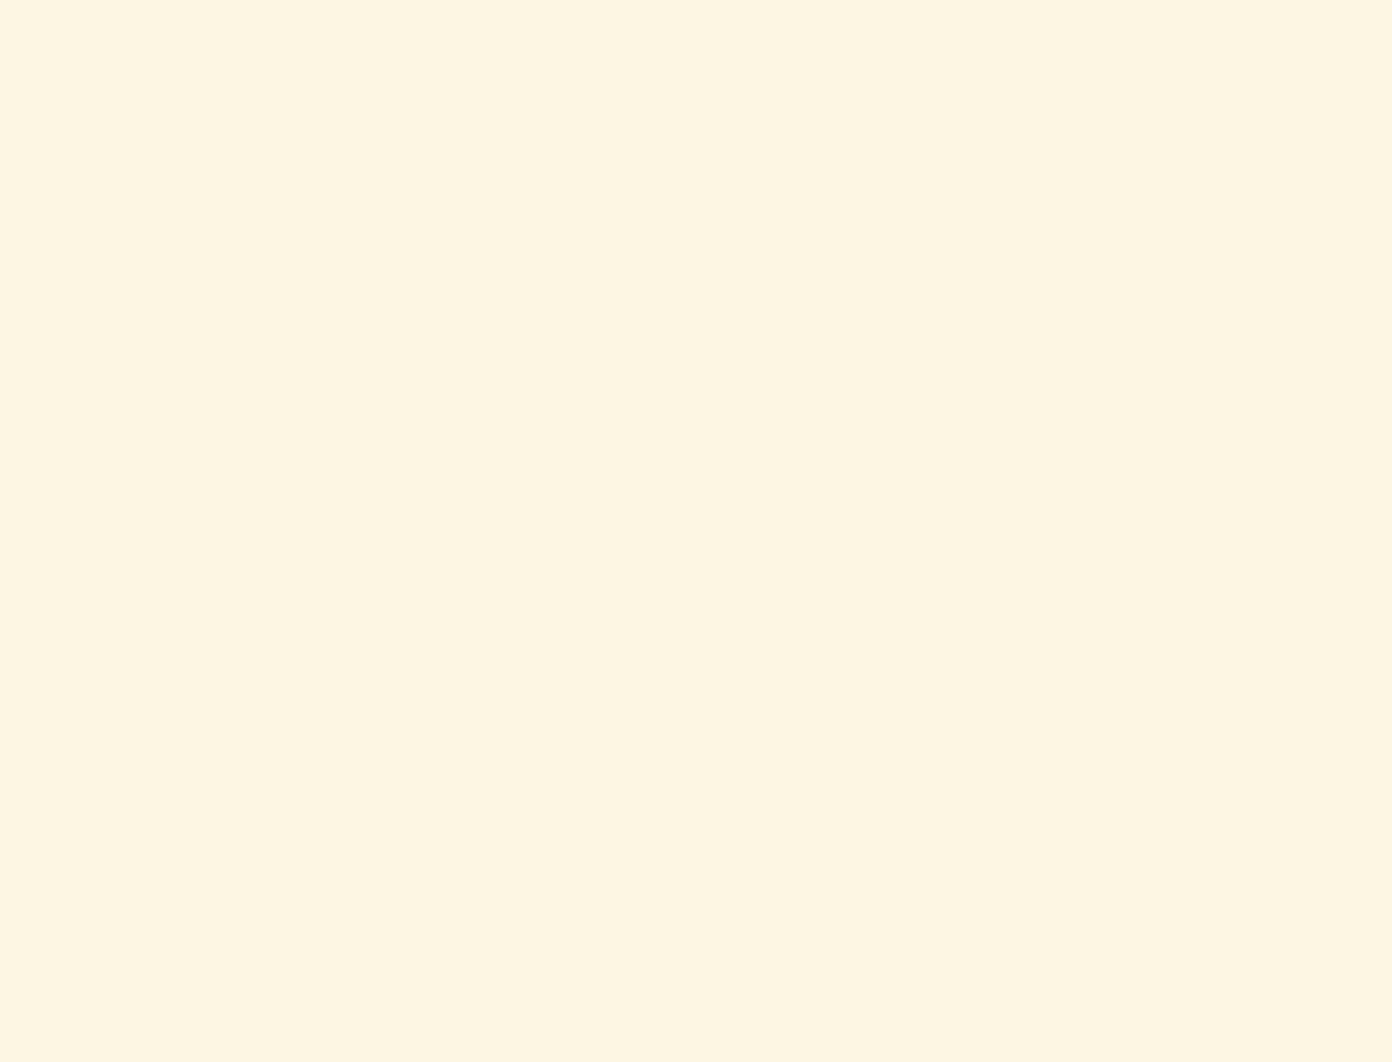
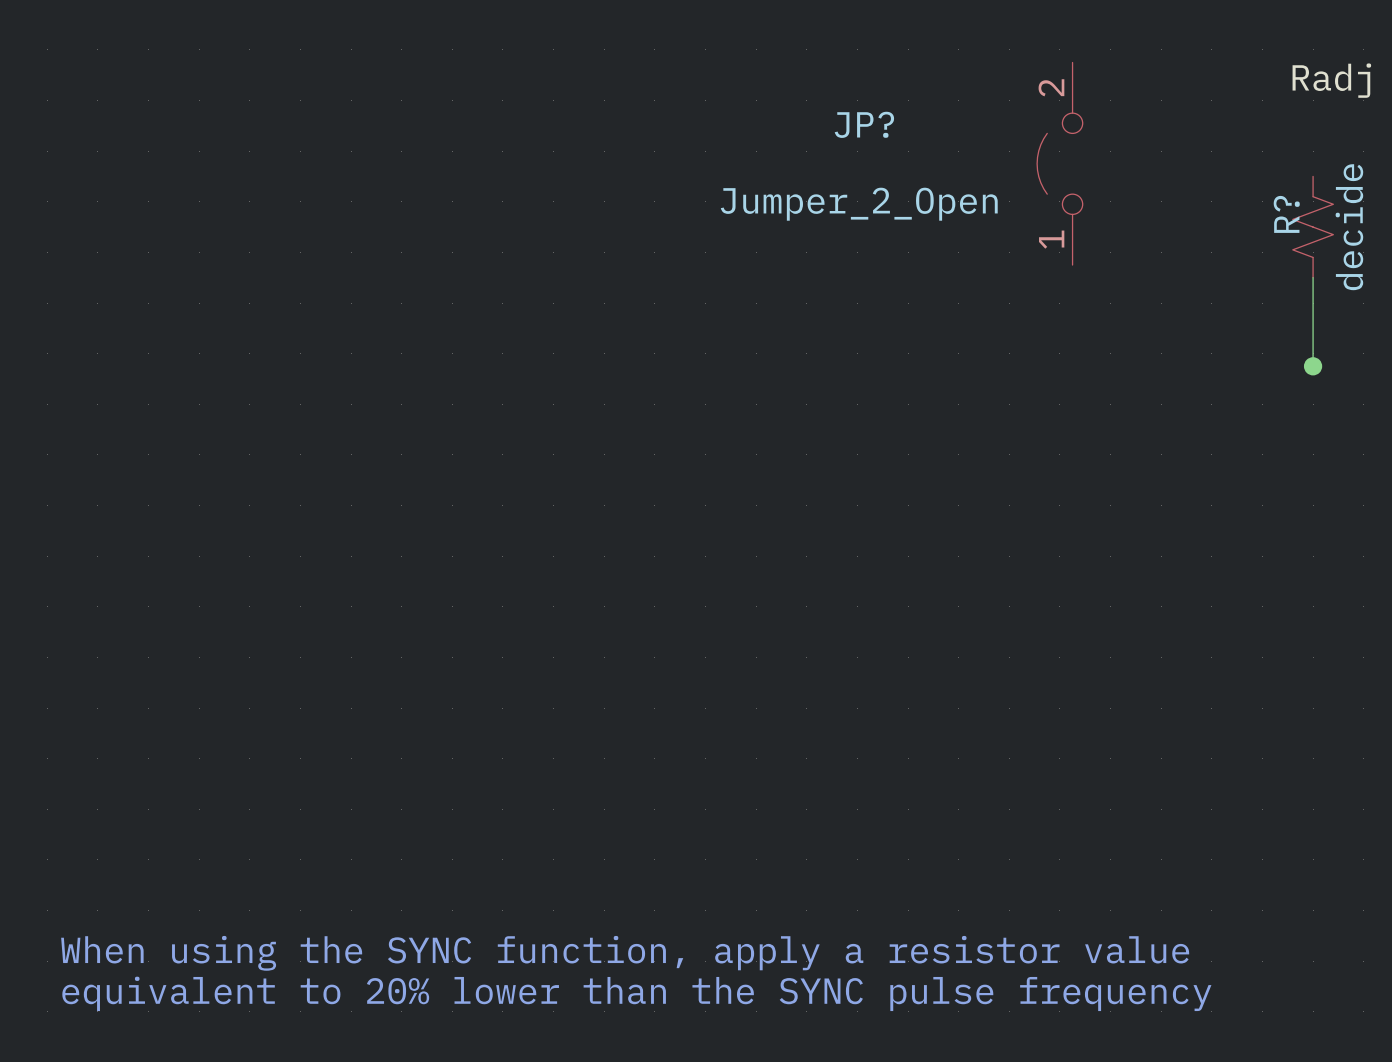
label: none -> Radj (1331, 80)
JP?: none -> Jumper_2_Open (1059, 163)
R?: none -> decide (1313, 227)
wire: none -> (1313, 277) (1313, 366)
junction: none -> (1313, 366)
text: none -> When using the SYNC function, apply a resistor value (625, 953)
text: none -> equivalent to 20% lower than the SYNC pulse frequency (636, 993)

